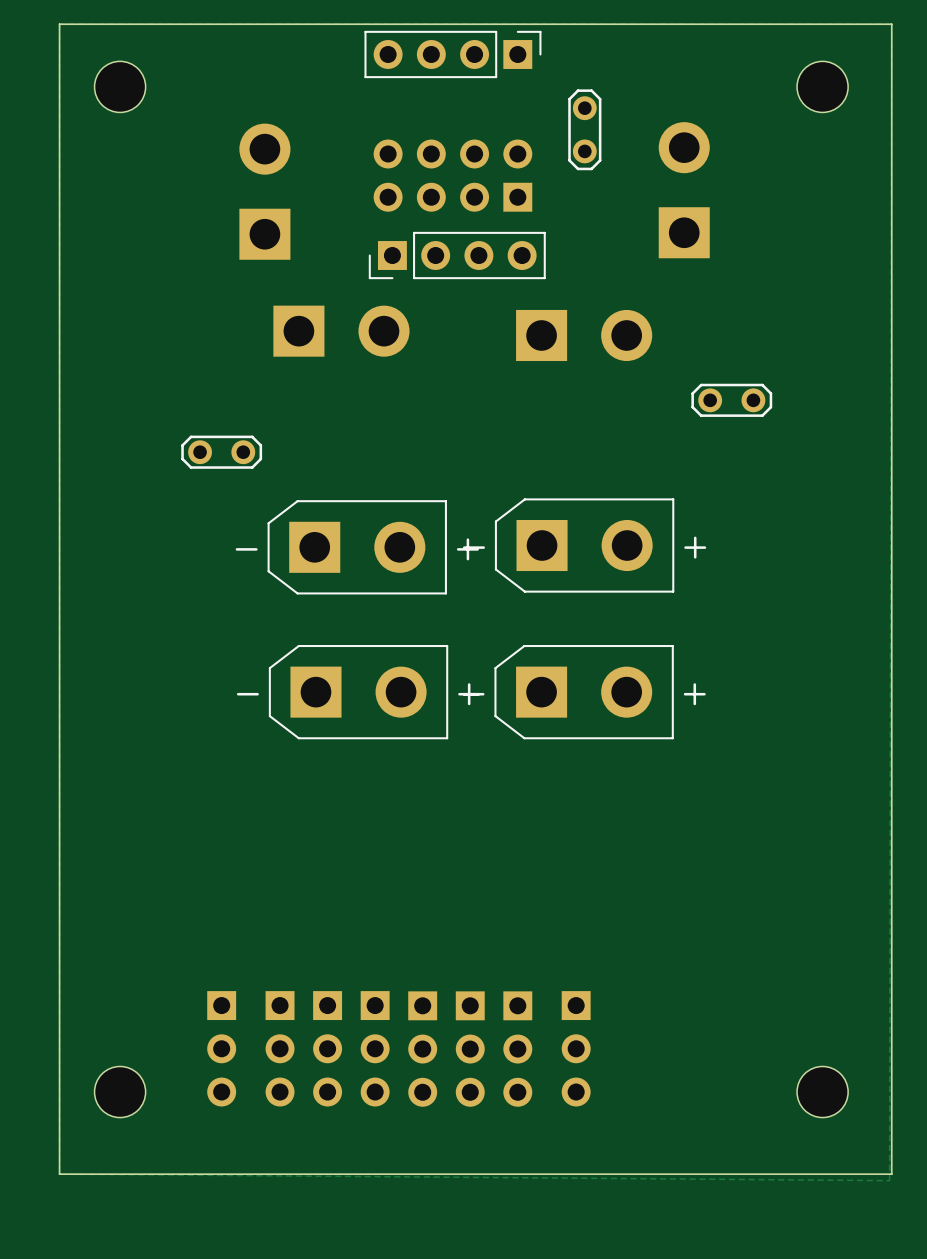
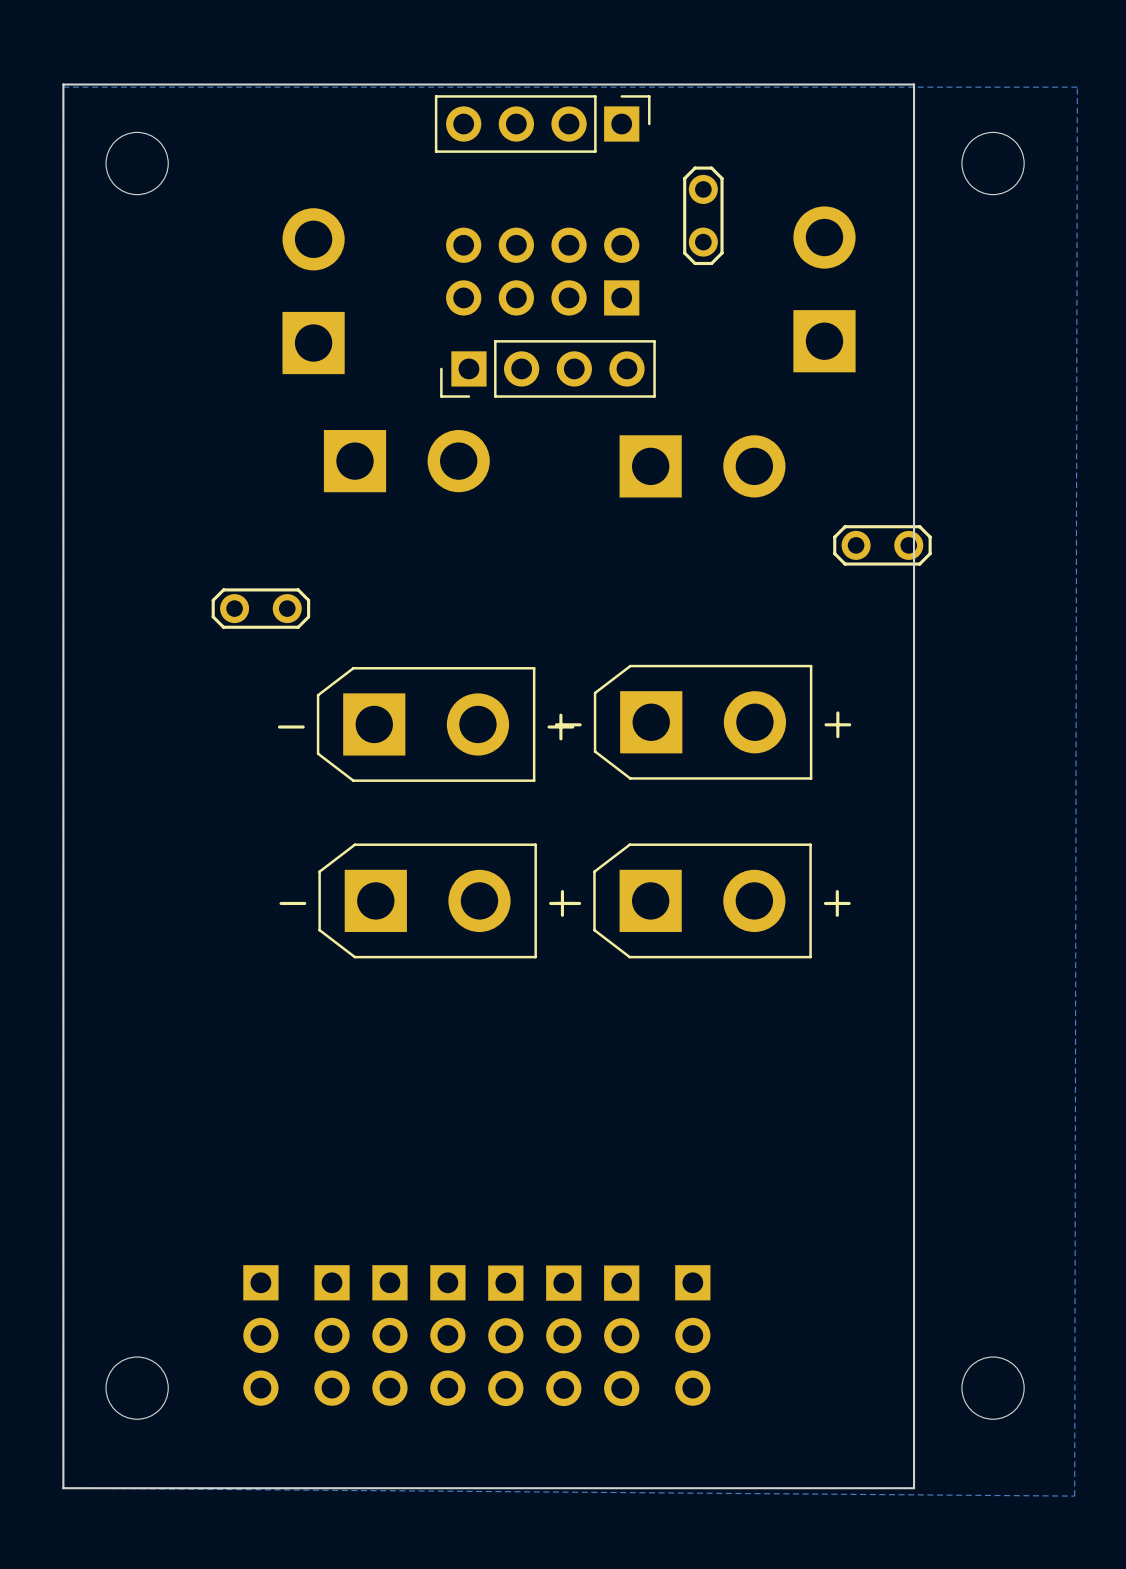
board edge: (59, 24) (891, 24) (891, 1174) (757, 1174) -> (63, 87) (63, 84) (914, 84) (914, 1488)

